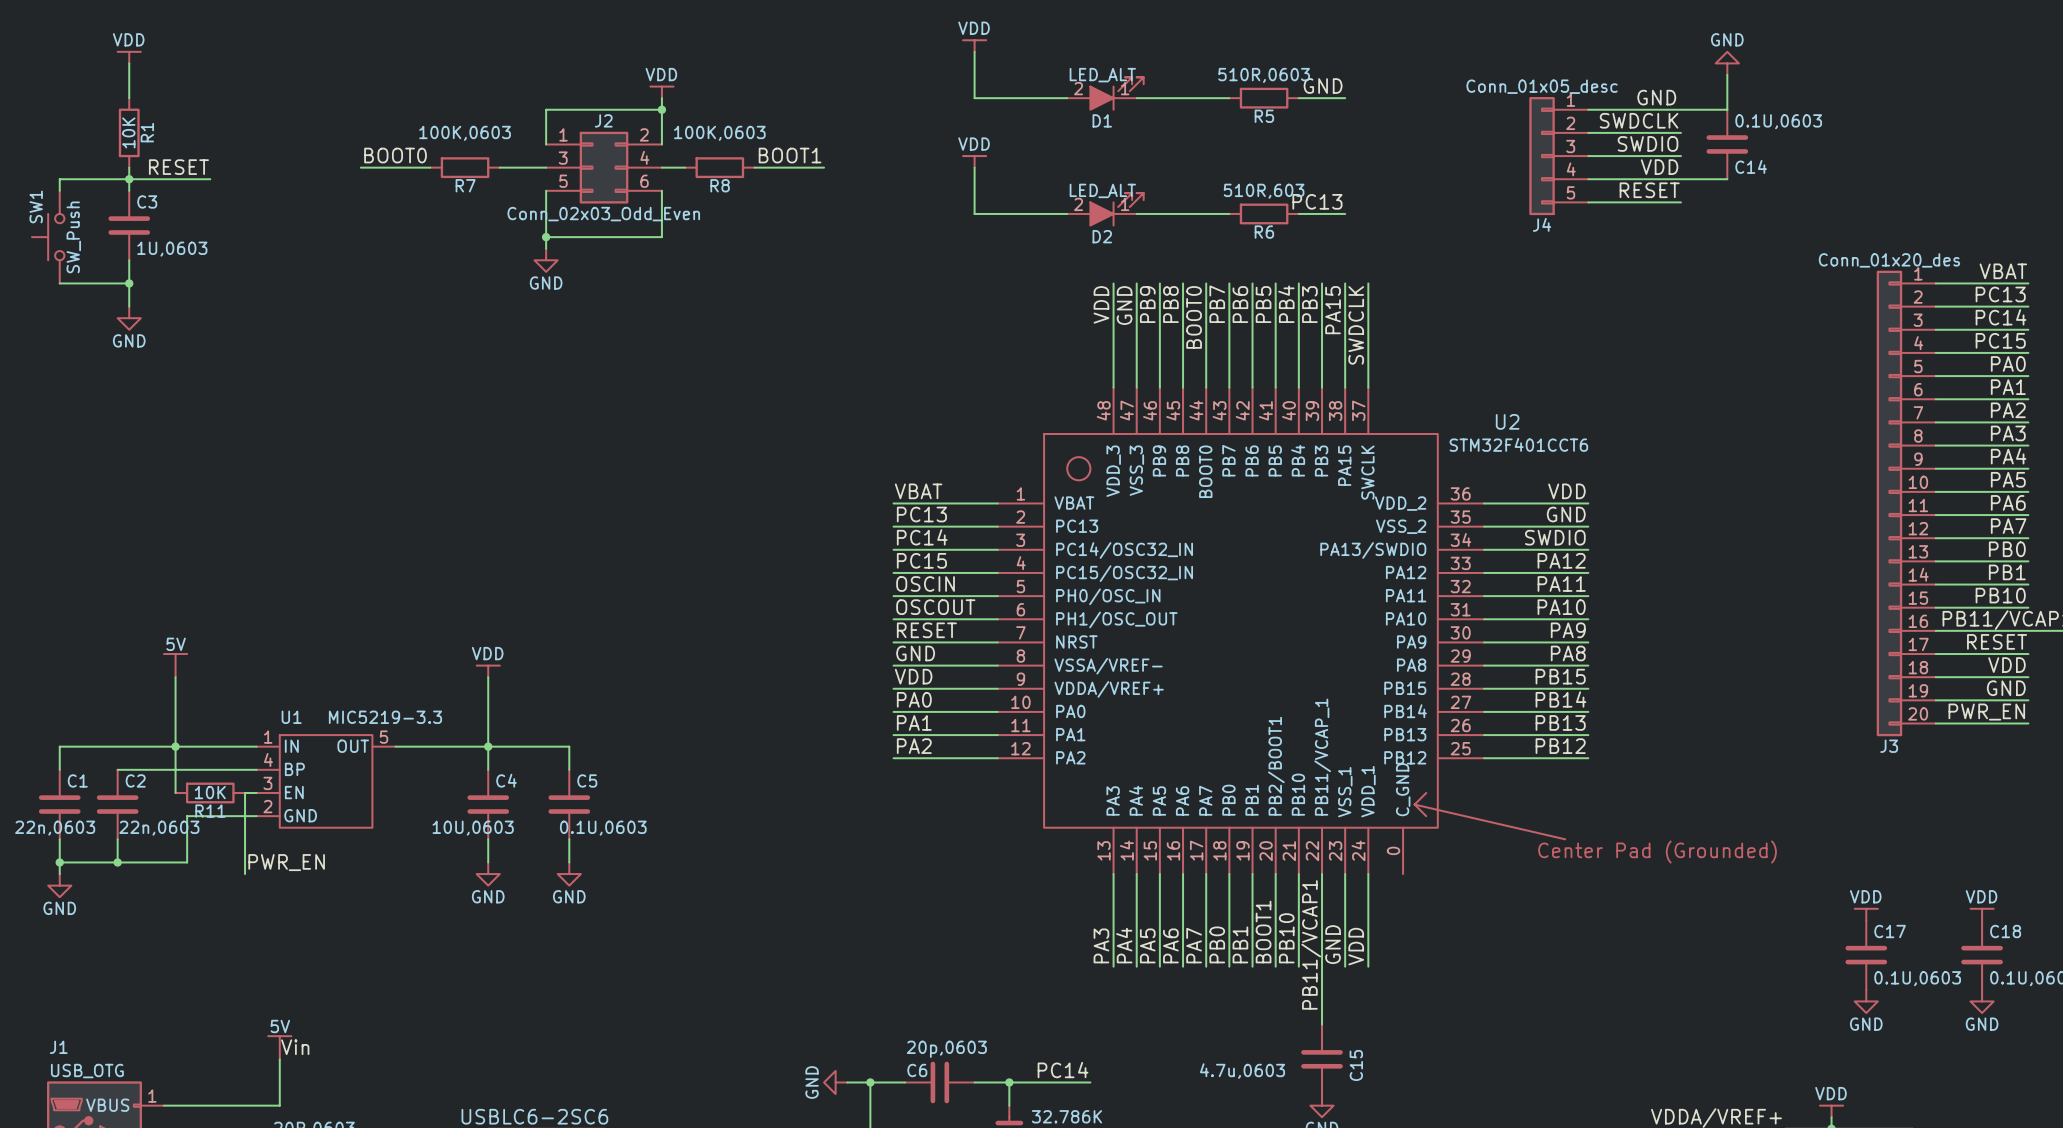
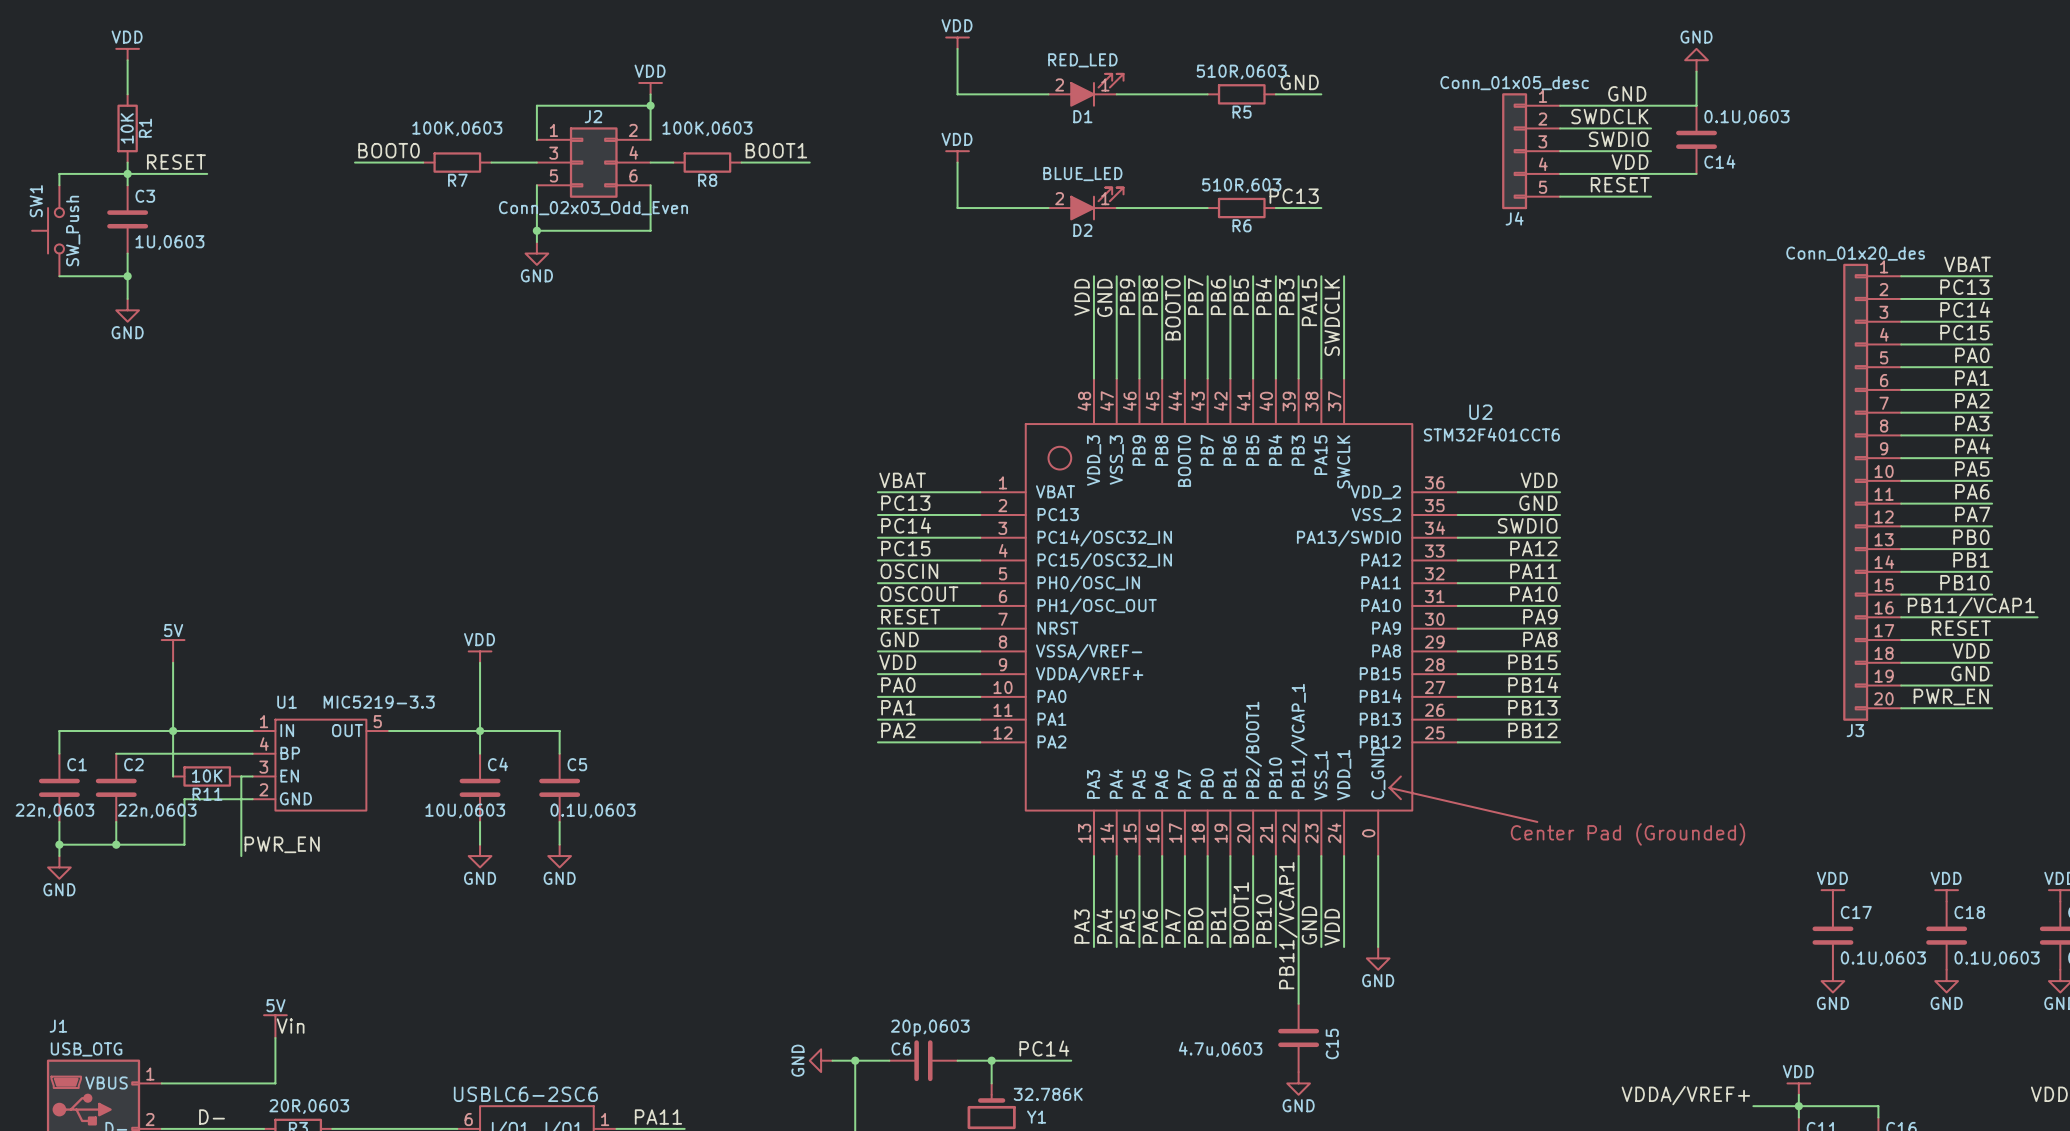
D1 value: LED_ALT (1102, 75) -> RED_LED (1082, 60)
D2 value: LED_ALT (1102, 190) -> BLUE_LED (1082, 174)
wire: none -> (1378, 856) (1378, 947)
power symbol: none -> GND (1378, 958)

